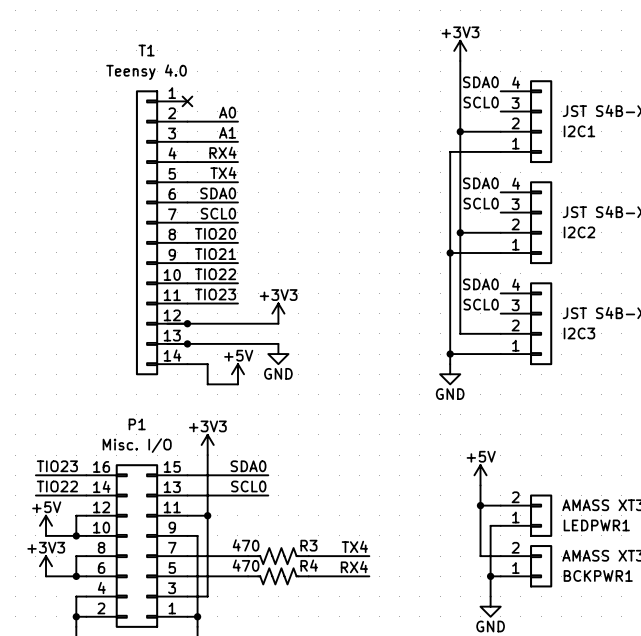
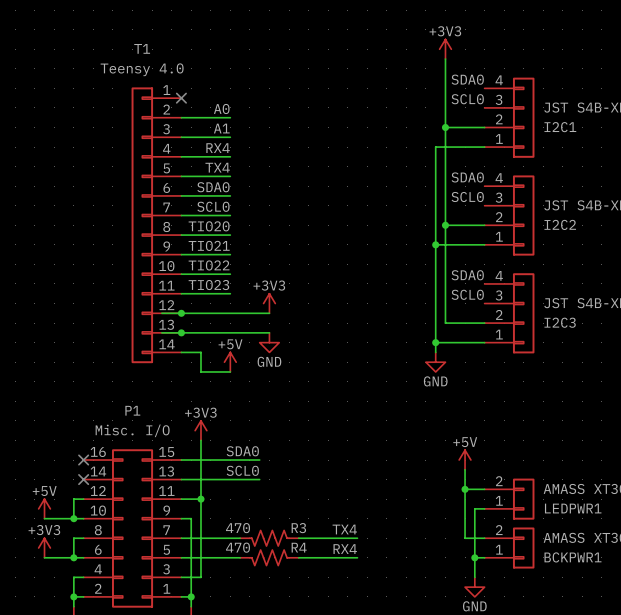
label: TIO23 (57, 466) -> none
wire: (35, 475) (86, 475) -> none
no-connect mark: none -> (83, 460)
label: TIO22 (57, 486) -> none
wire: (35, 495) (86, 495) -> none
no-connect mark: none -> (83, 479)

